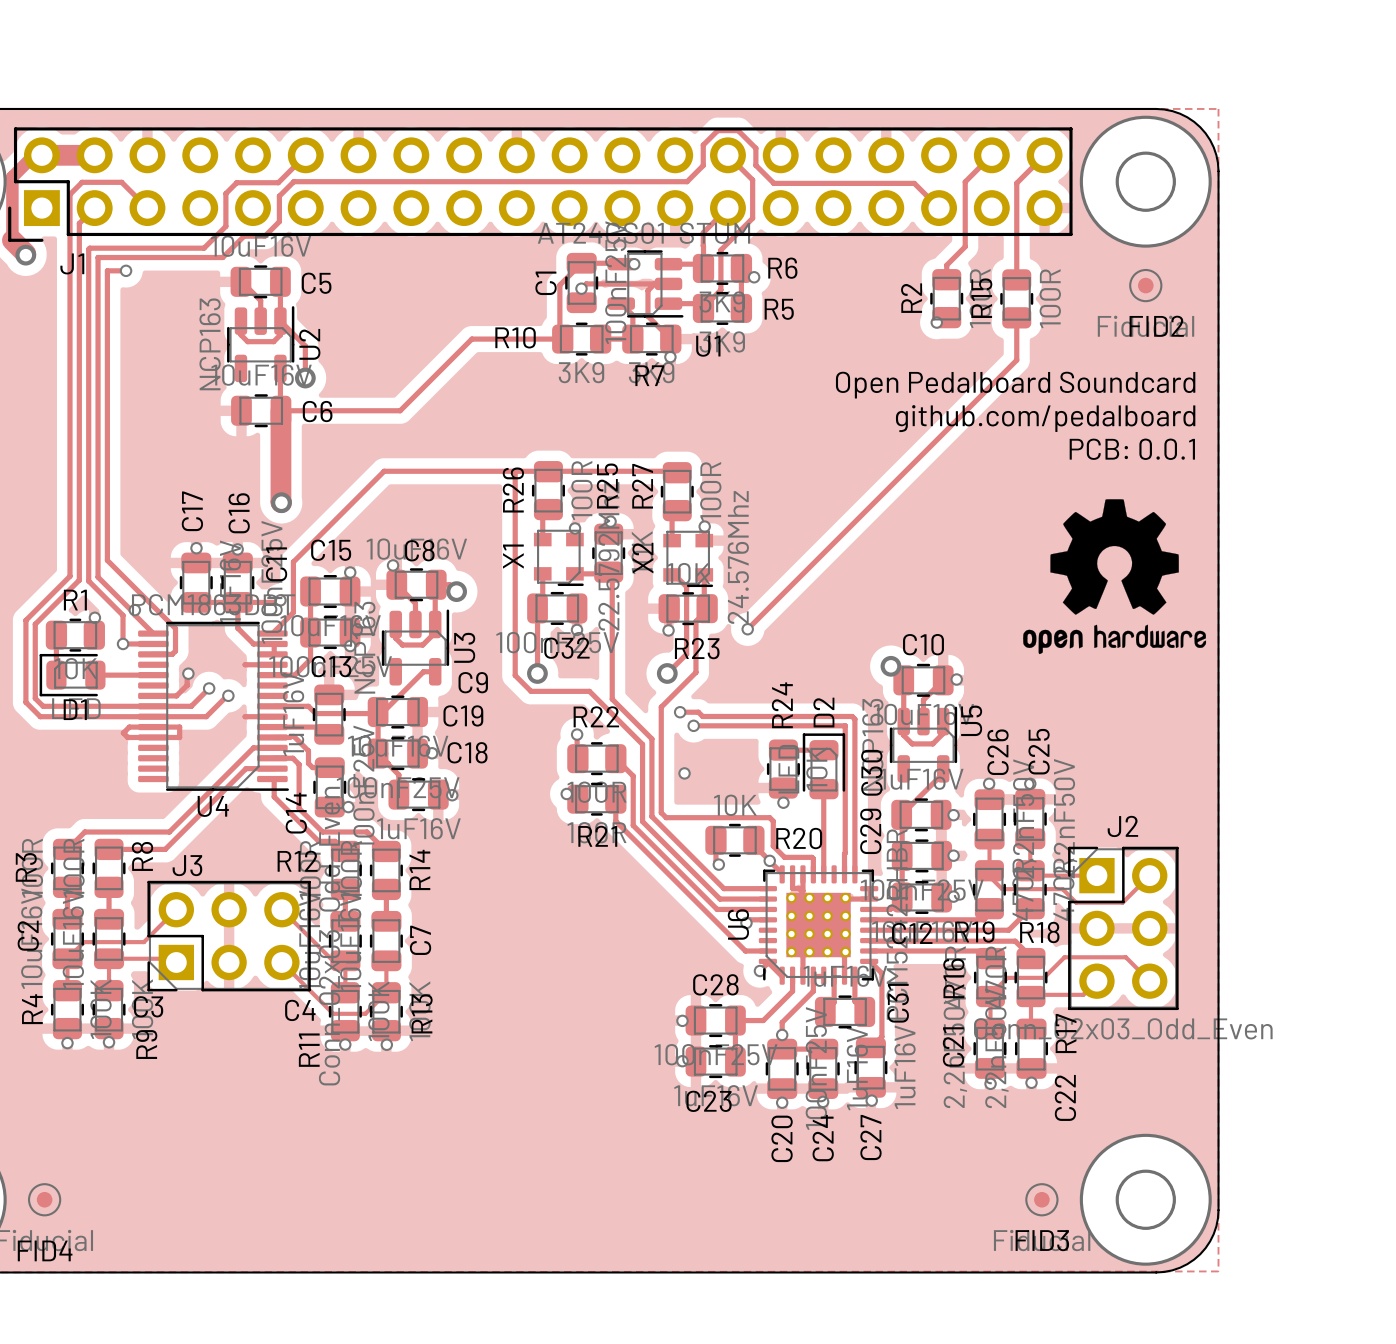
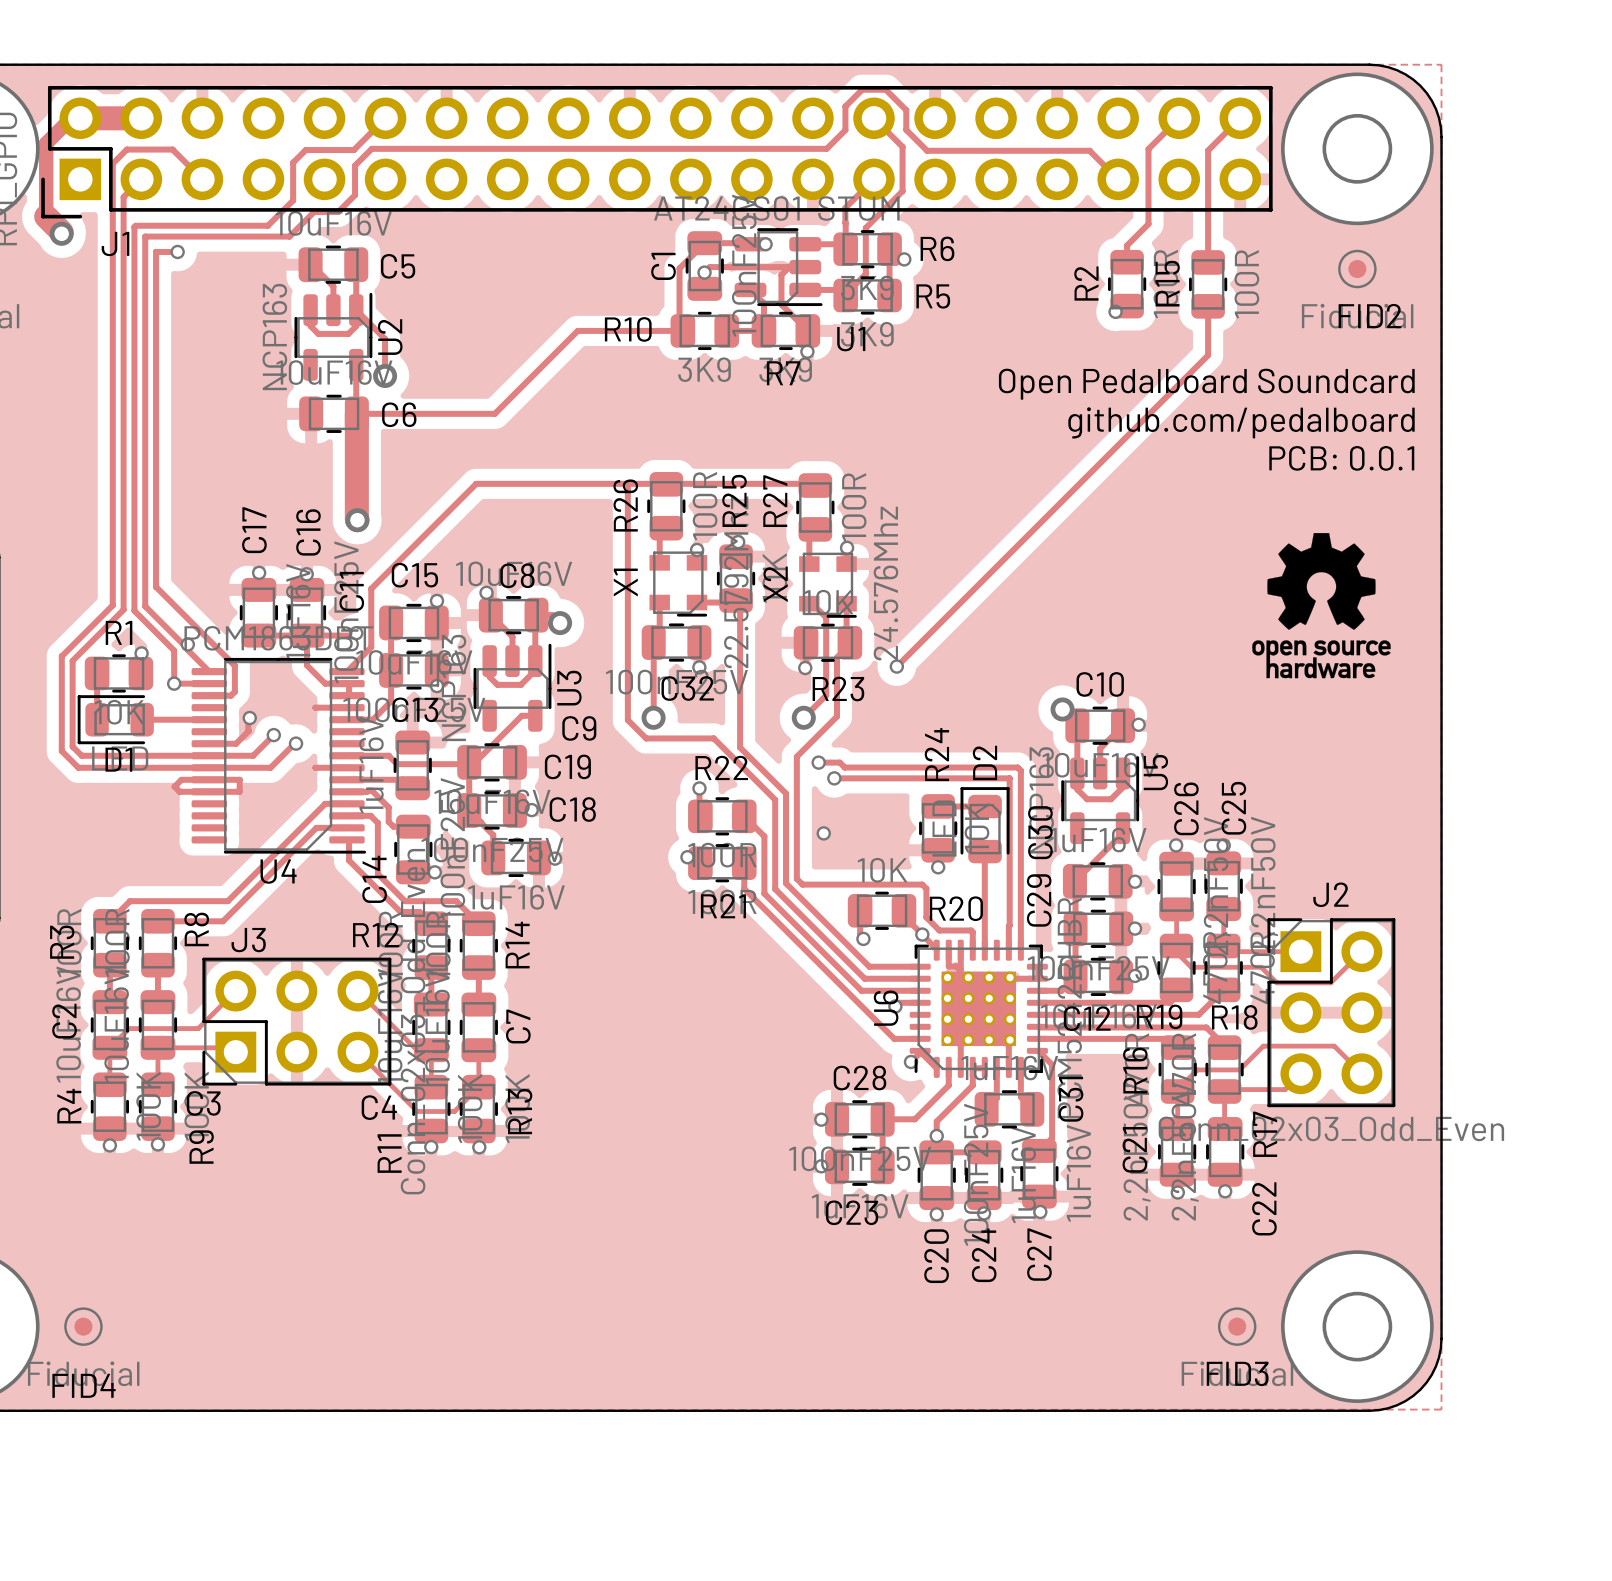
drawing shape: [1023, 499, 1207, 655] -> [1252, 533, 1391, 679]

